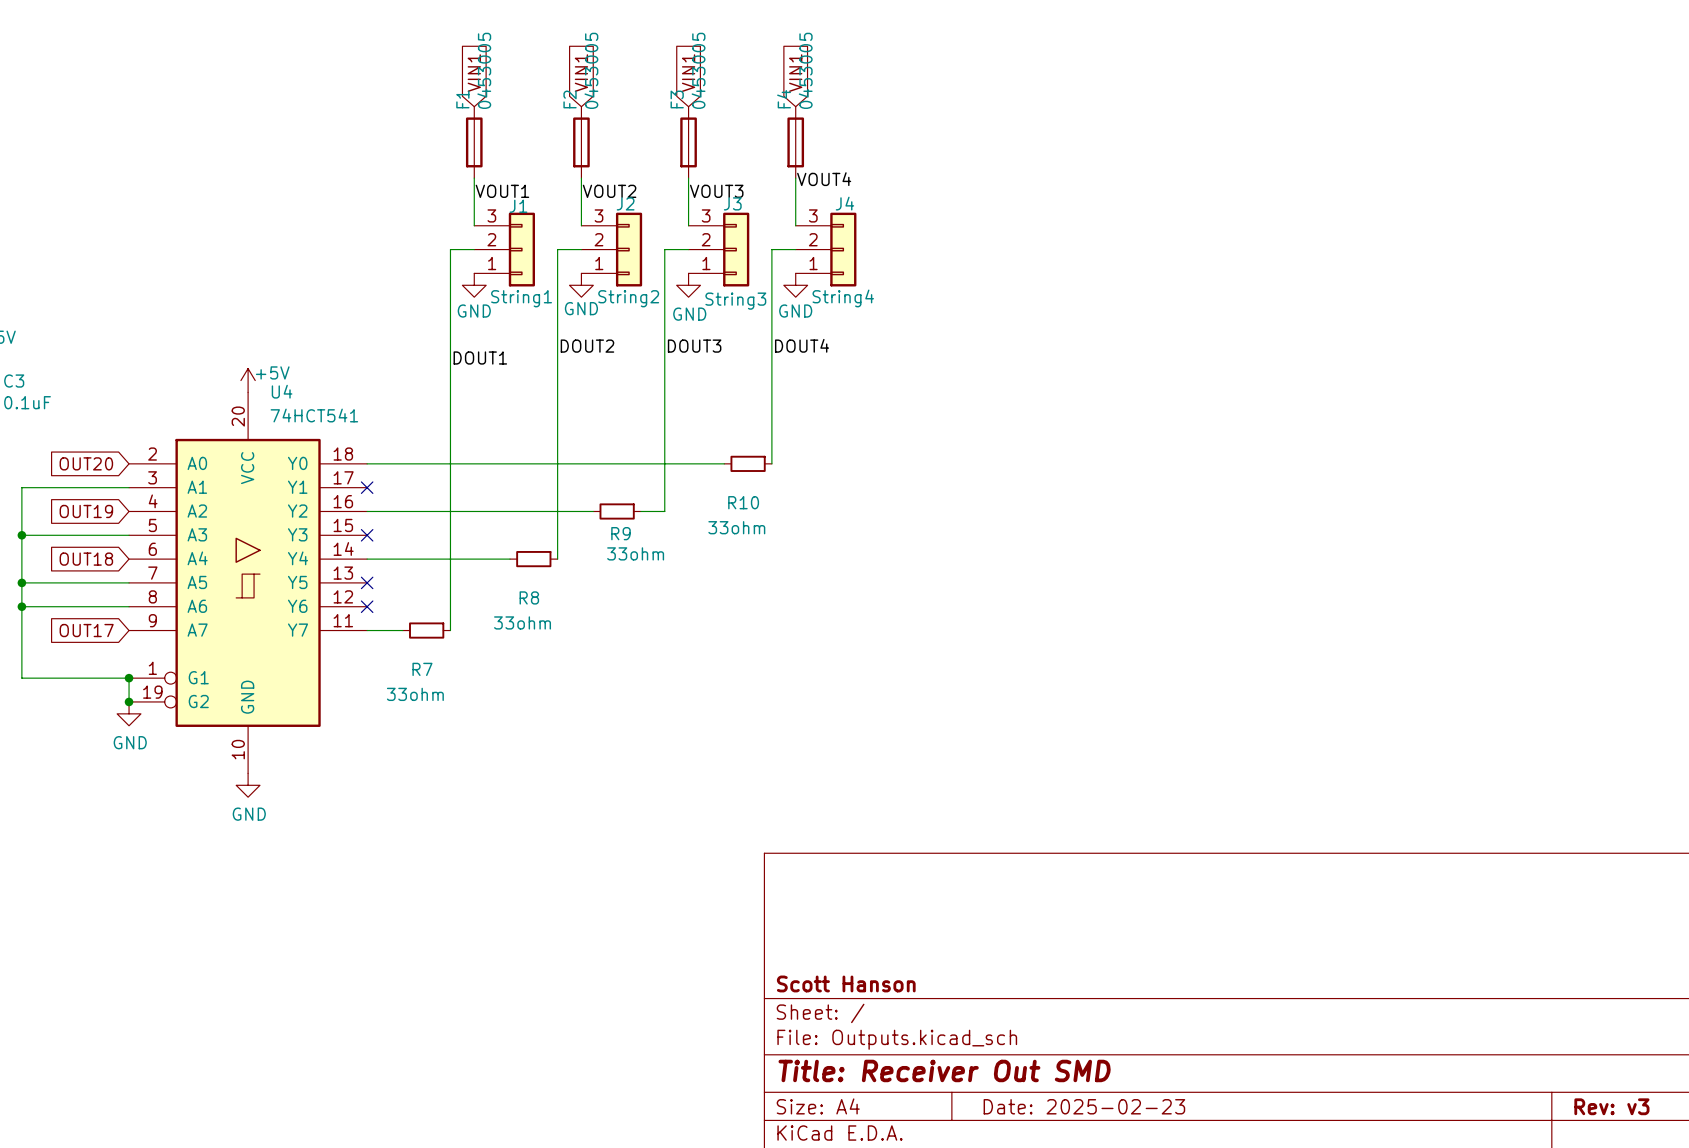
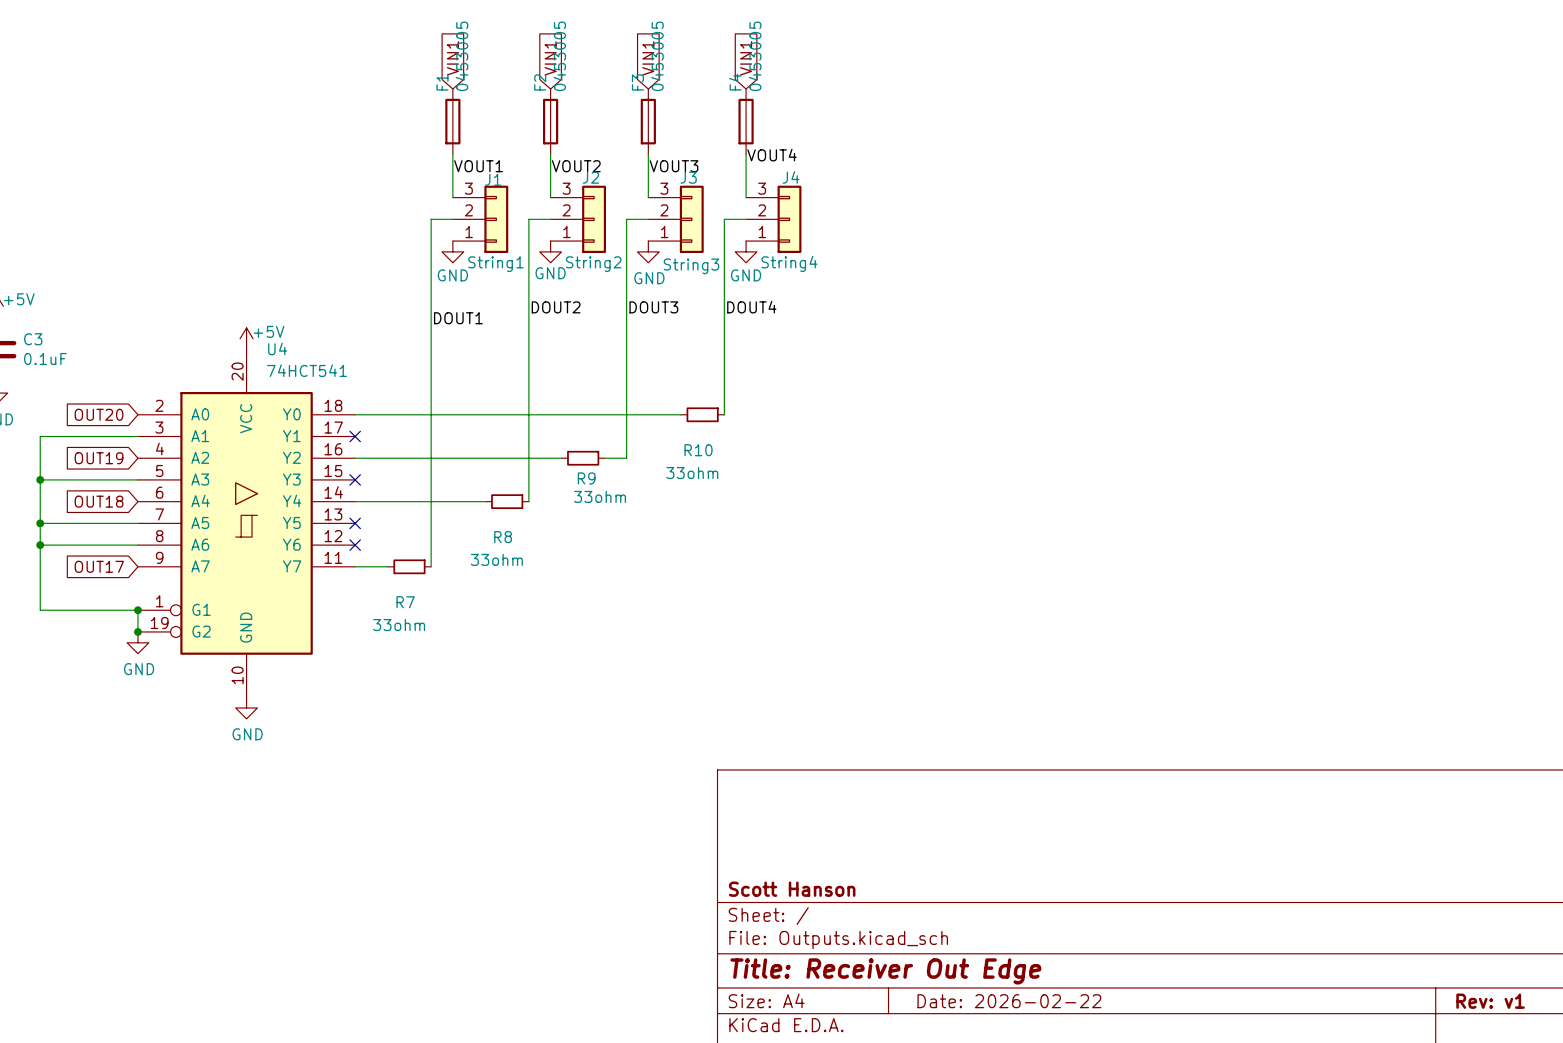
title block: Title: Receiver Out SMD (944, 1070) -> Title: Receiver Out Edge (885, 971)
title block: Date: 2025-02-23 (1084, 1106) -> Date: 2026-02-22 (1009, 1001)
title block: Rev: v3 (1611, 1106) -> Rev: v1 (1490, 1001)

